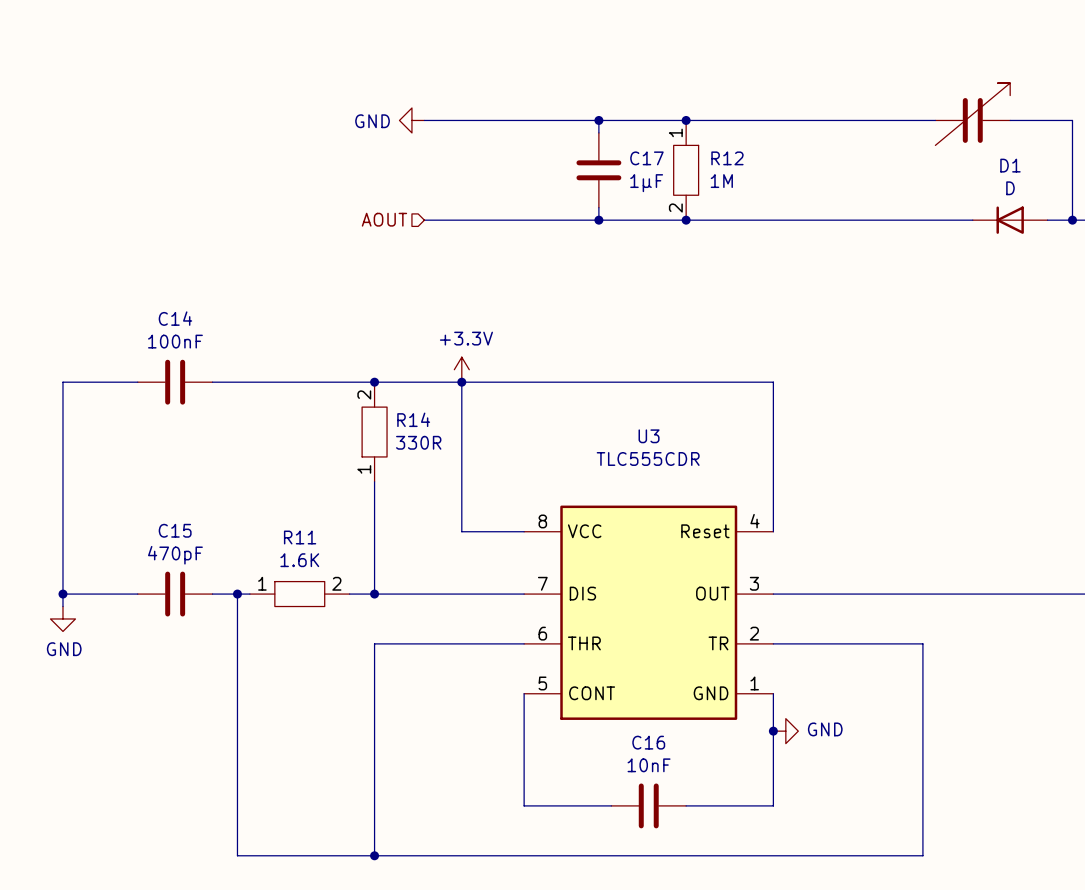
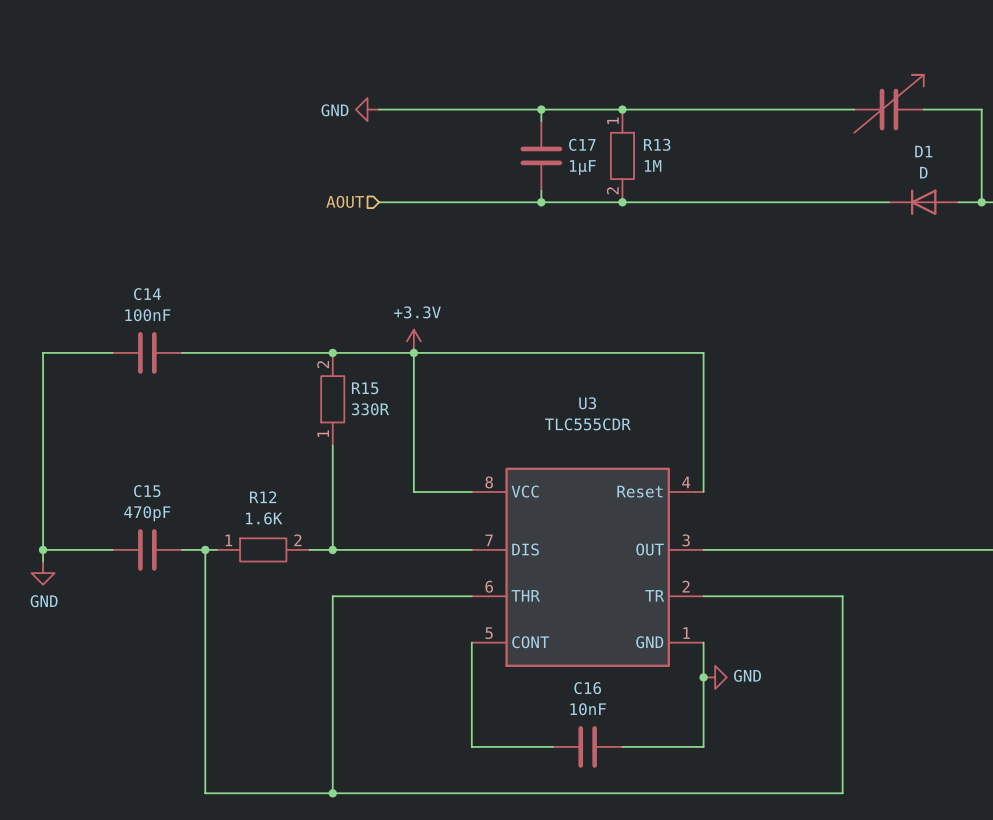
R12 name: R12 (727, 158) -> R13 (657, 144)
R14 name: R14 (413, 419) -> R15 (365, 388)
R11 name: R11 (300, 537) -> R12 (263, 497)

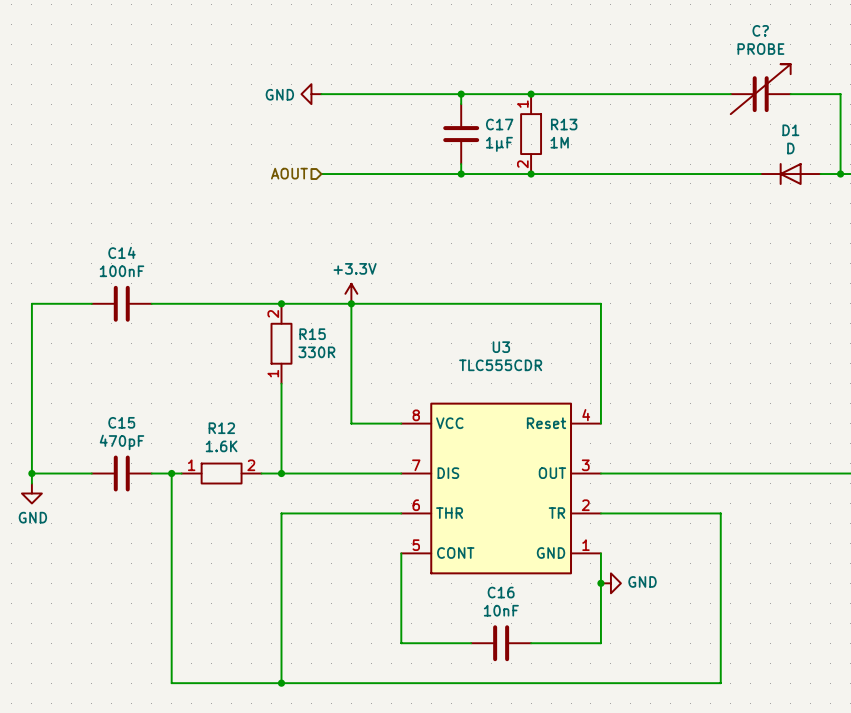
C? name: none -> C? (760, 30)
C? value: none -> PROBE (760, 49)

